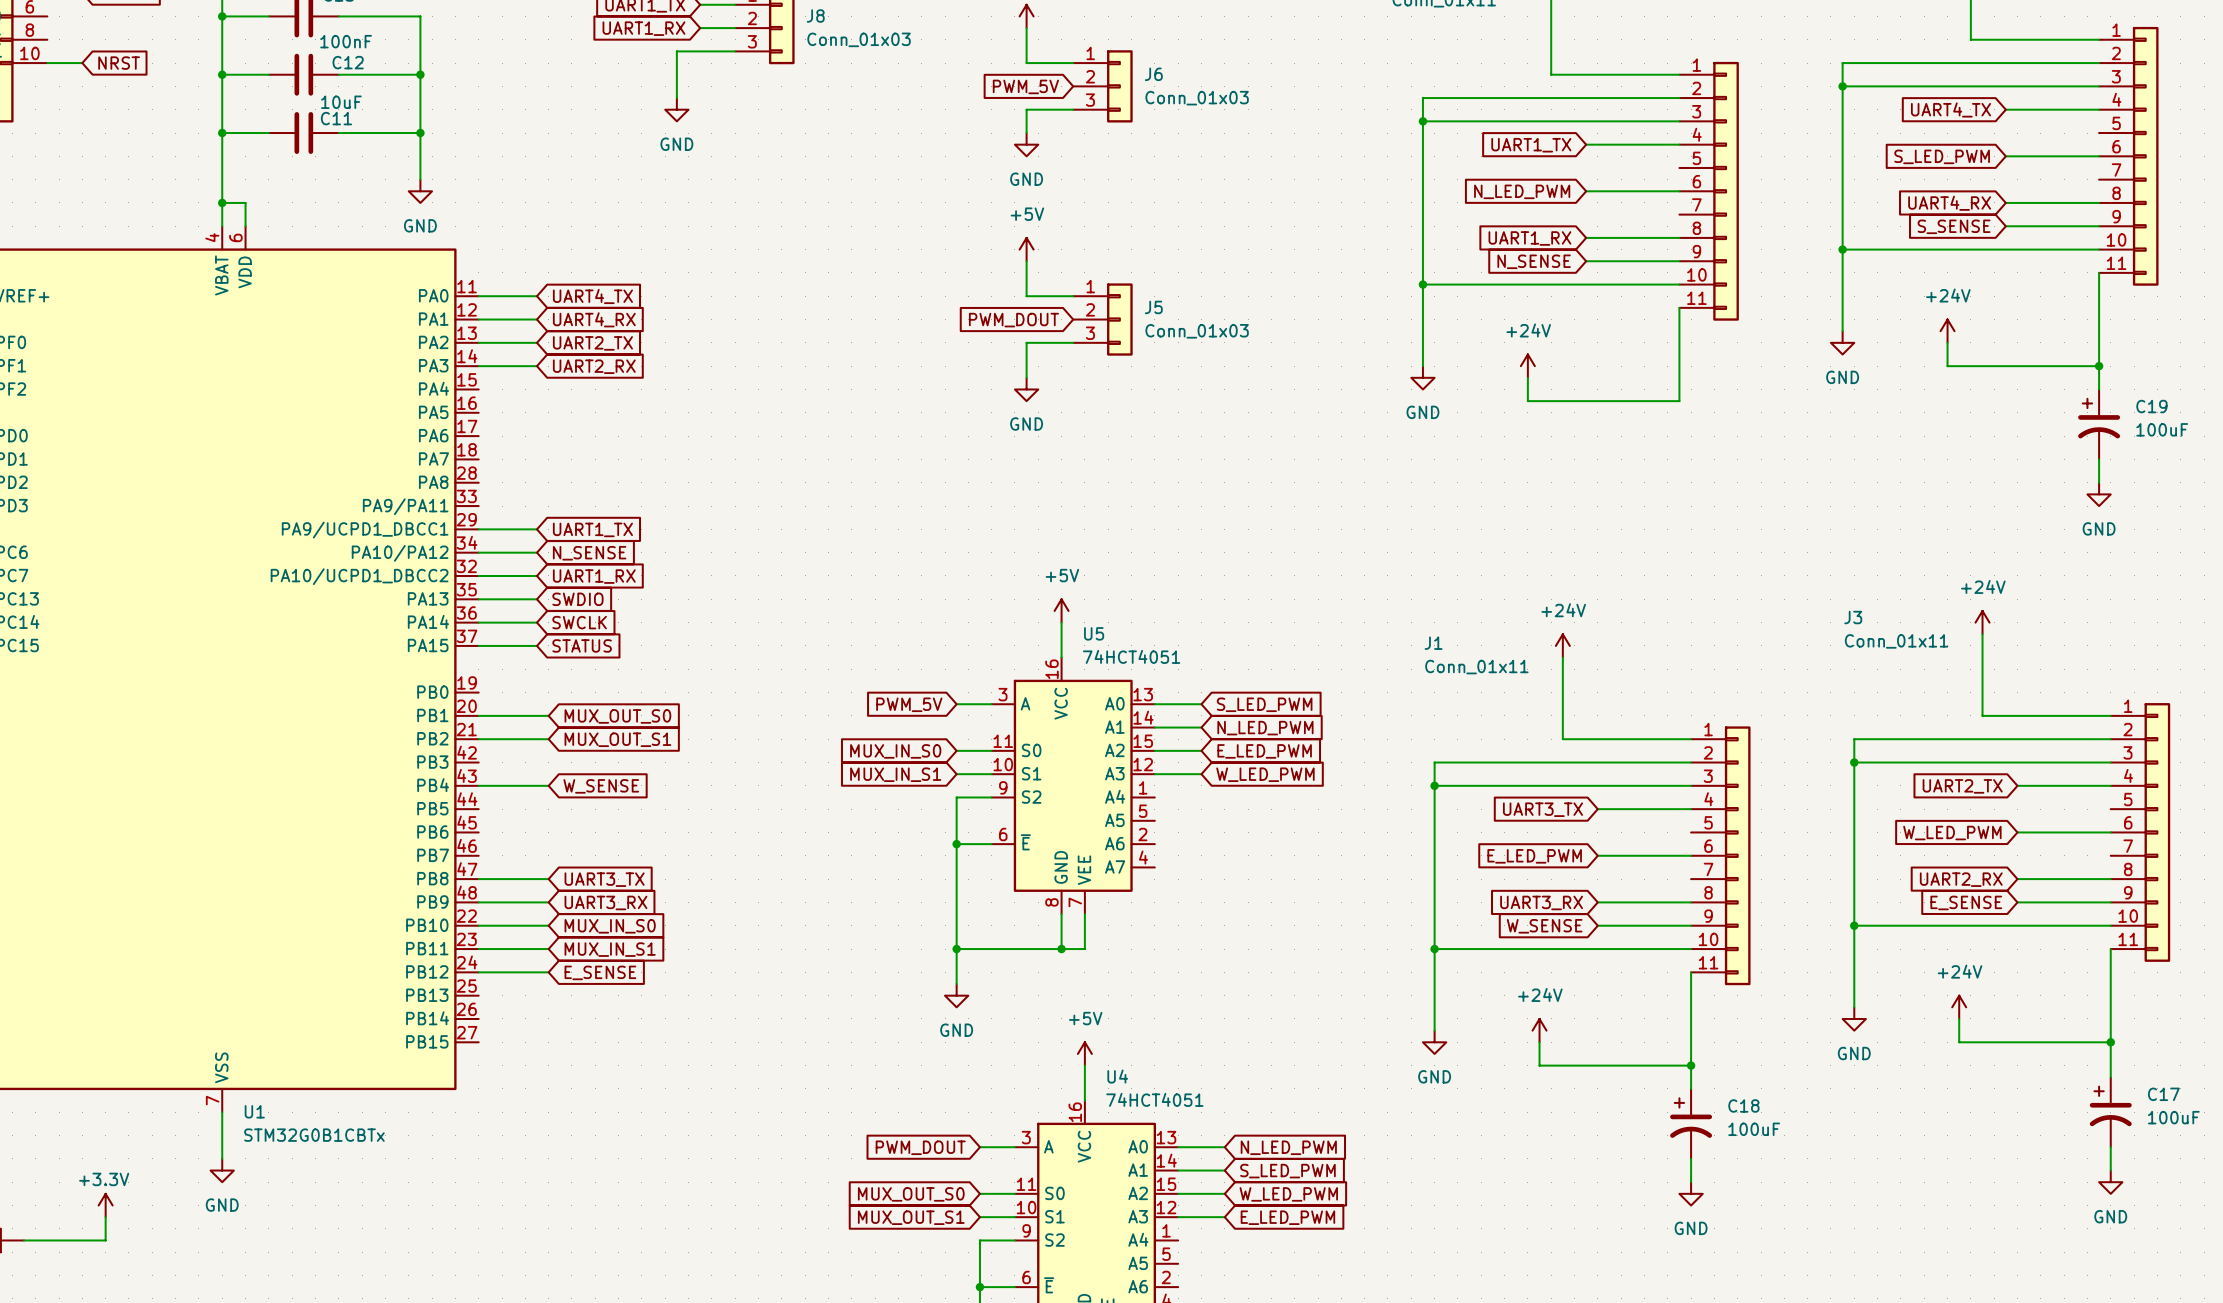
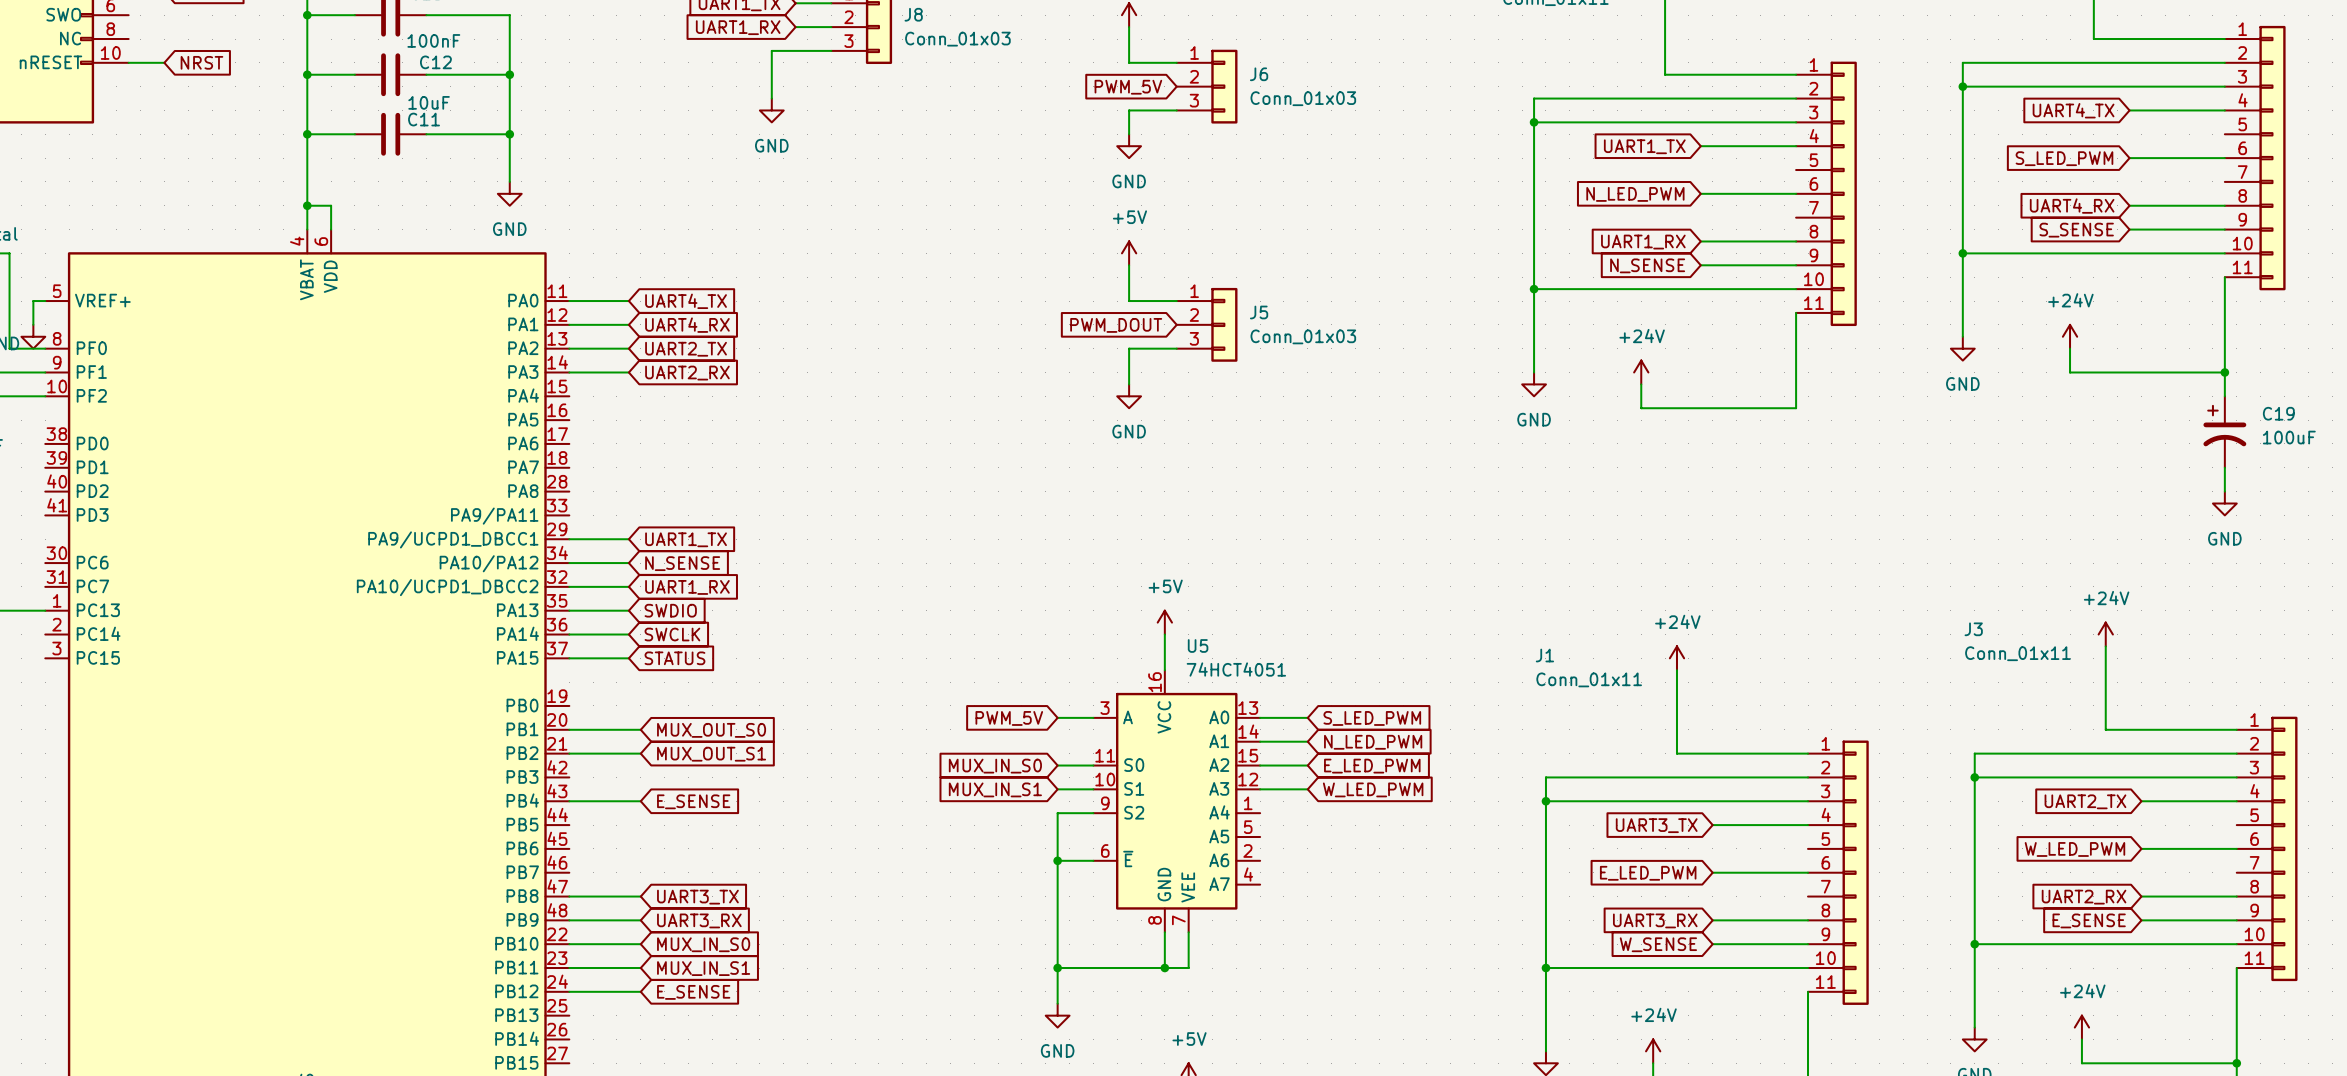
global label: W_SENSE (601, 786) -> E_SENSE (693, 801)

